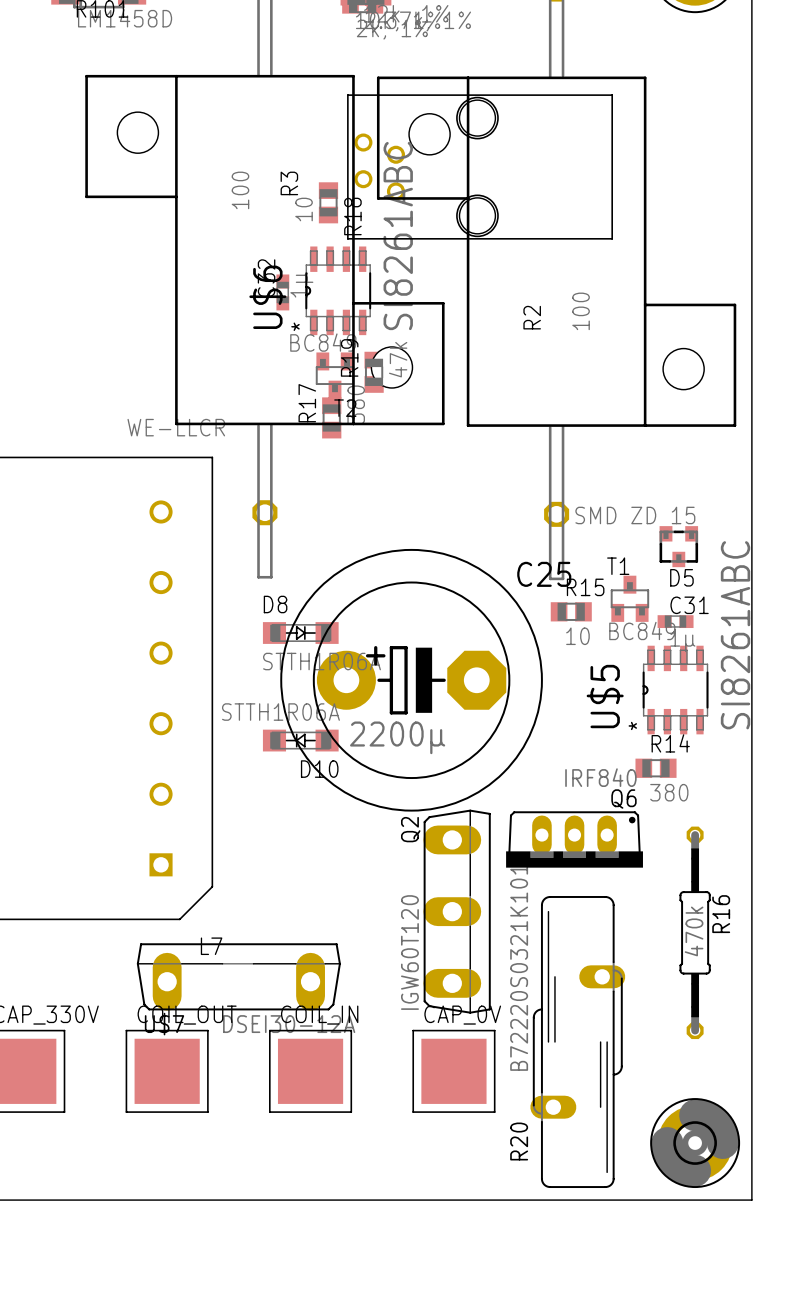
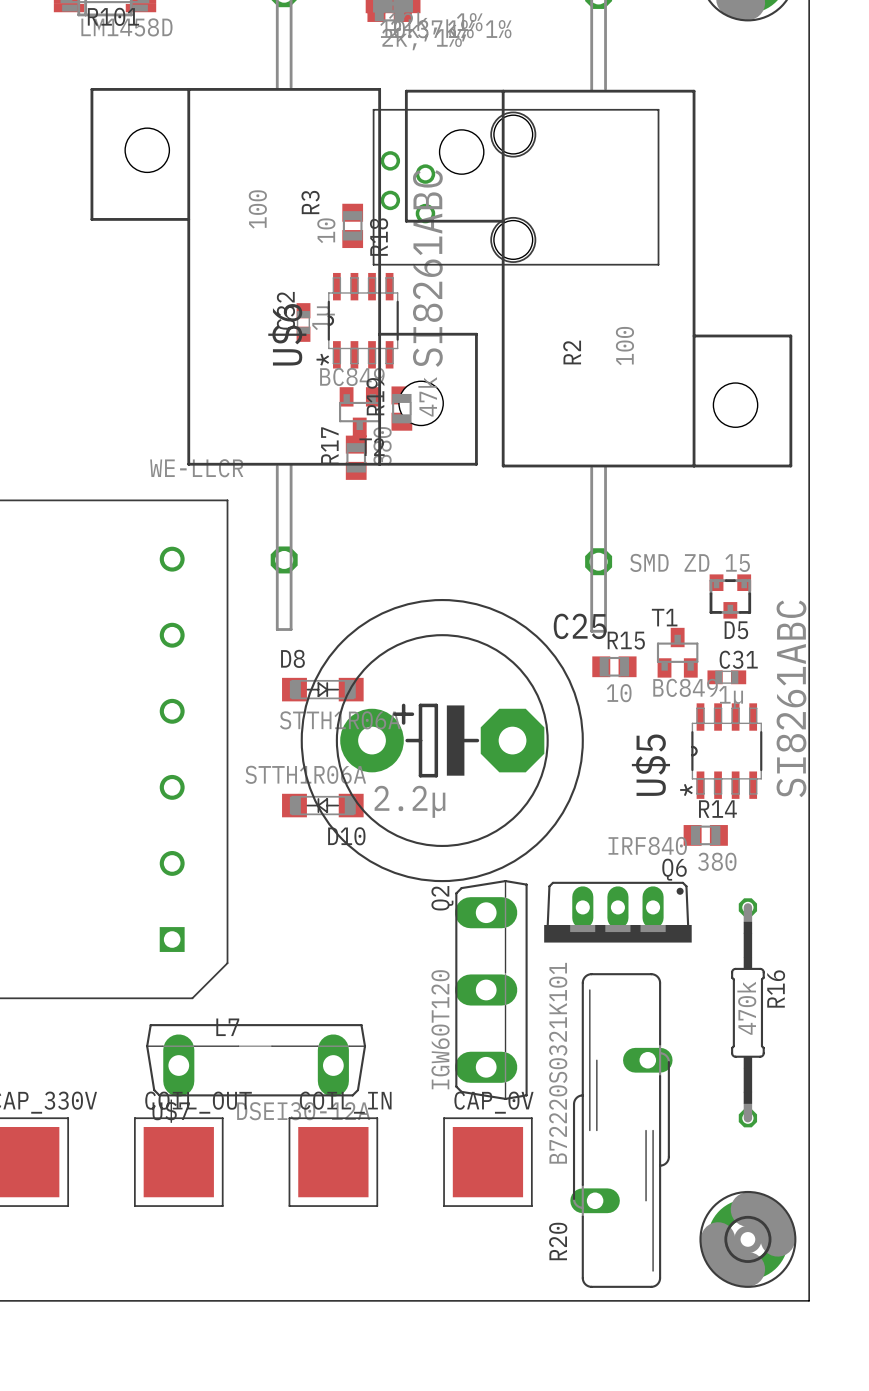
C25 value: 2200µ (397, 737) -> 2.2µ (409, 801)

